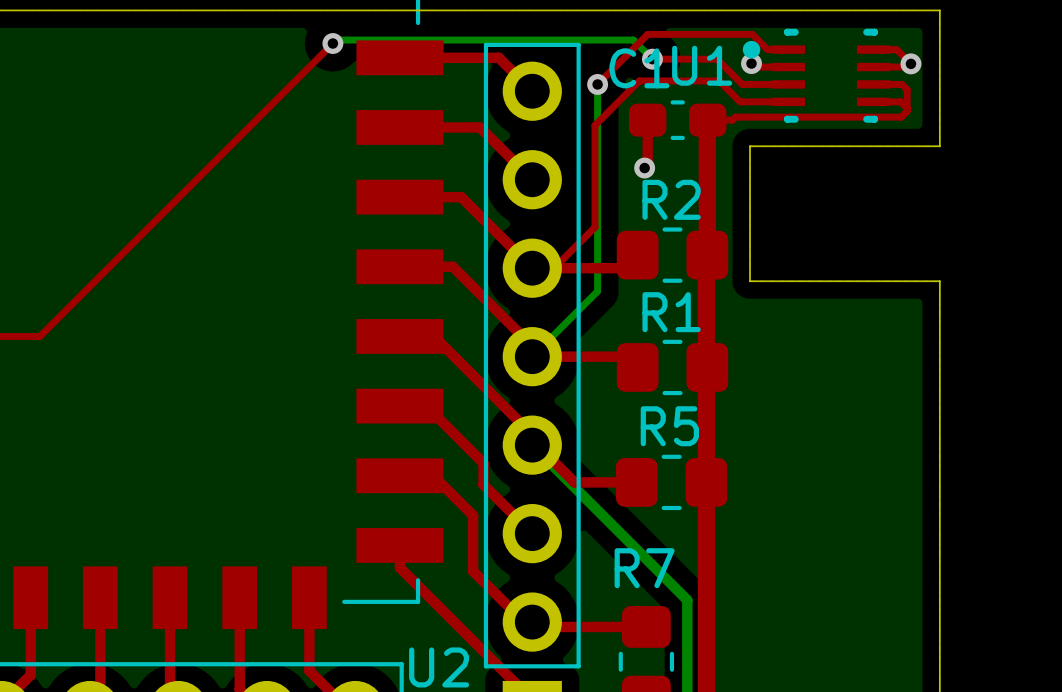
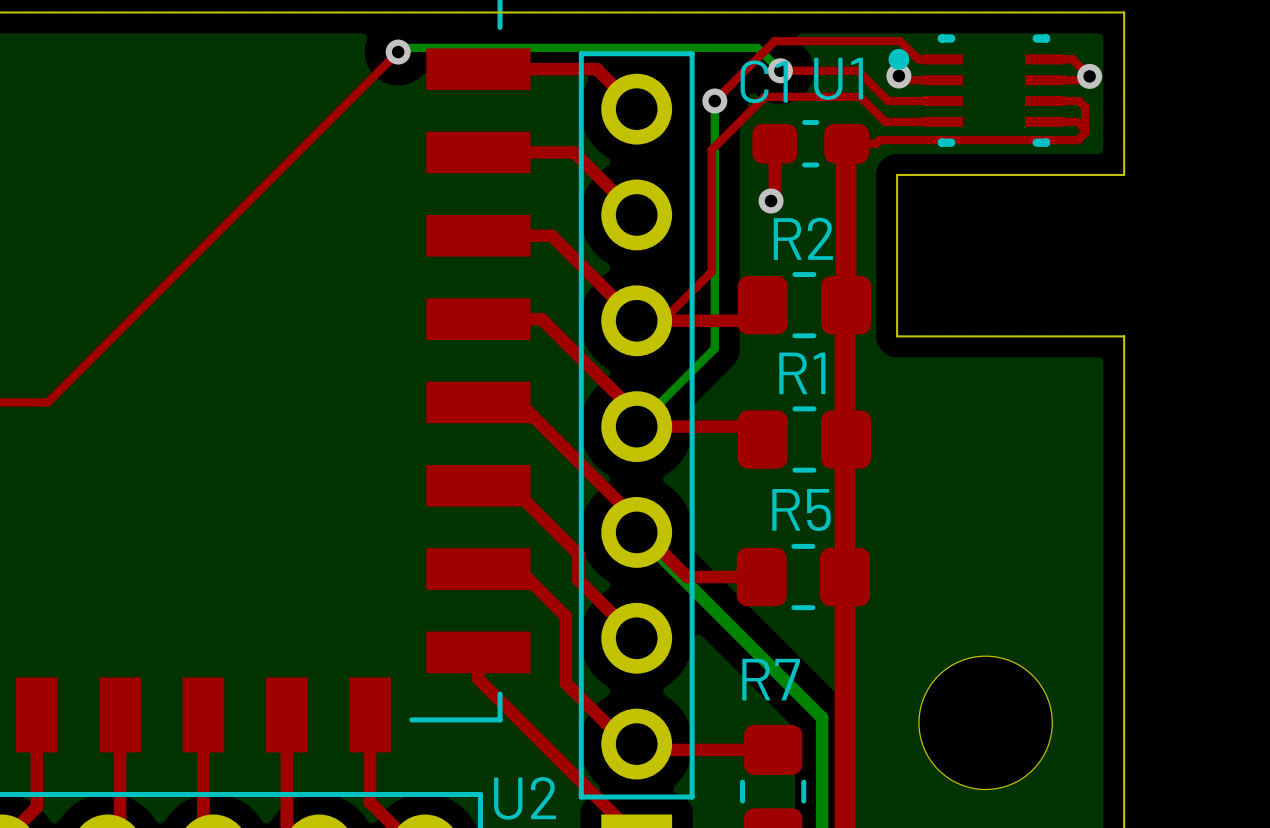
part: none -> (985, 722)

